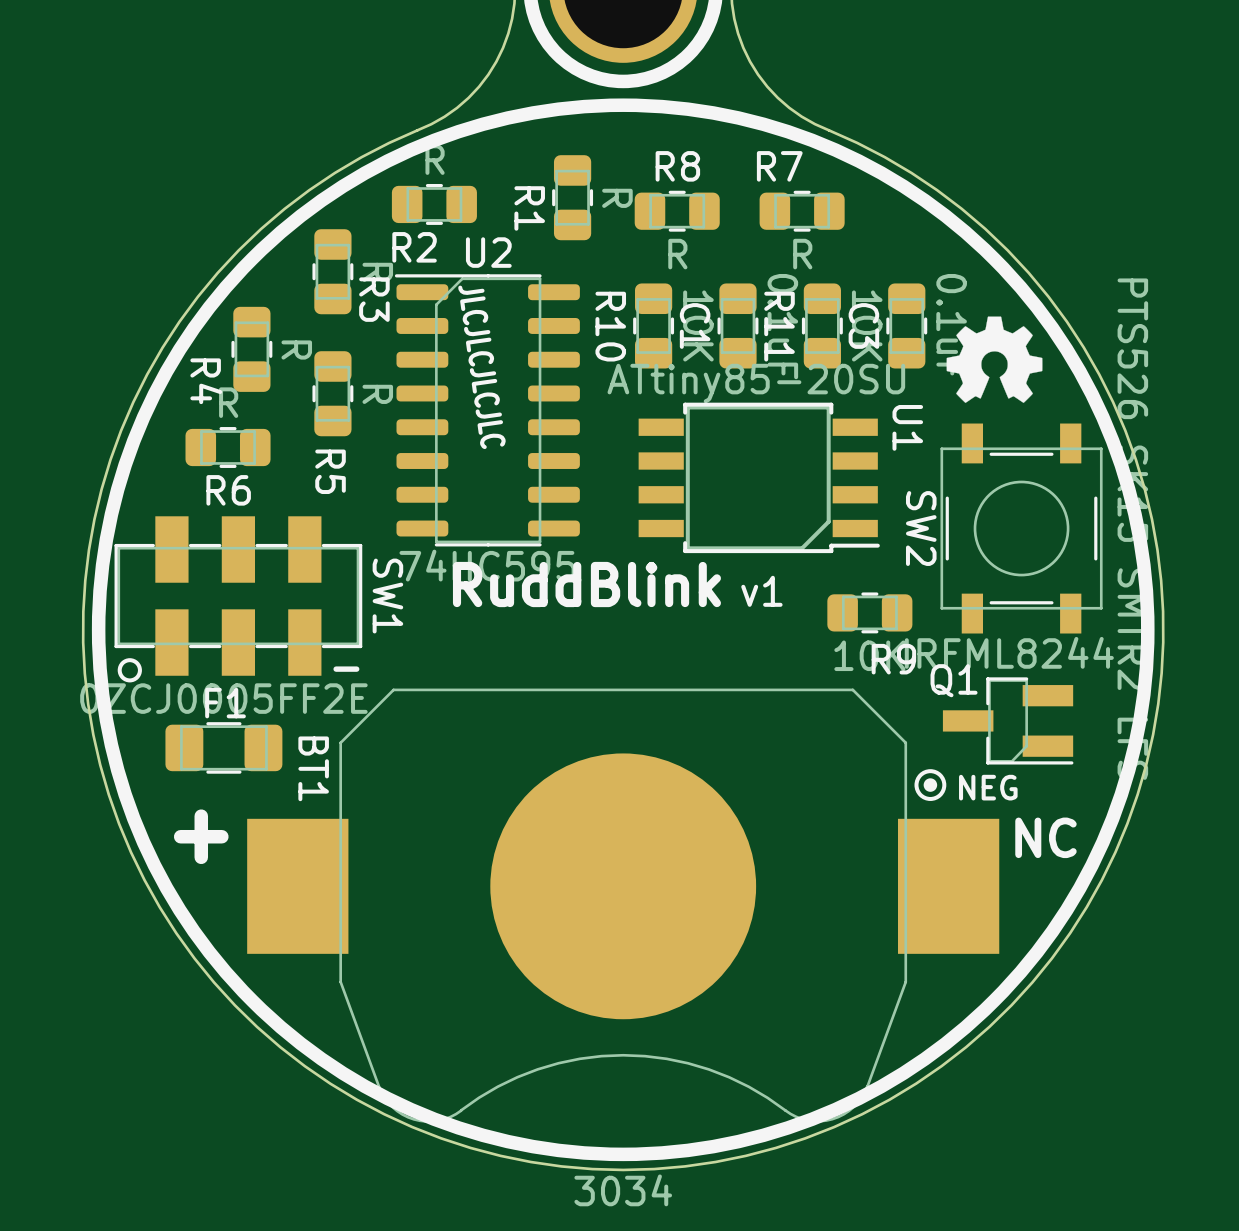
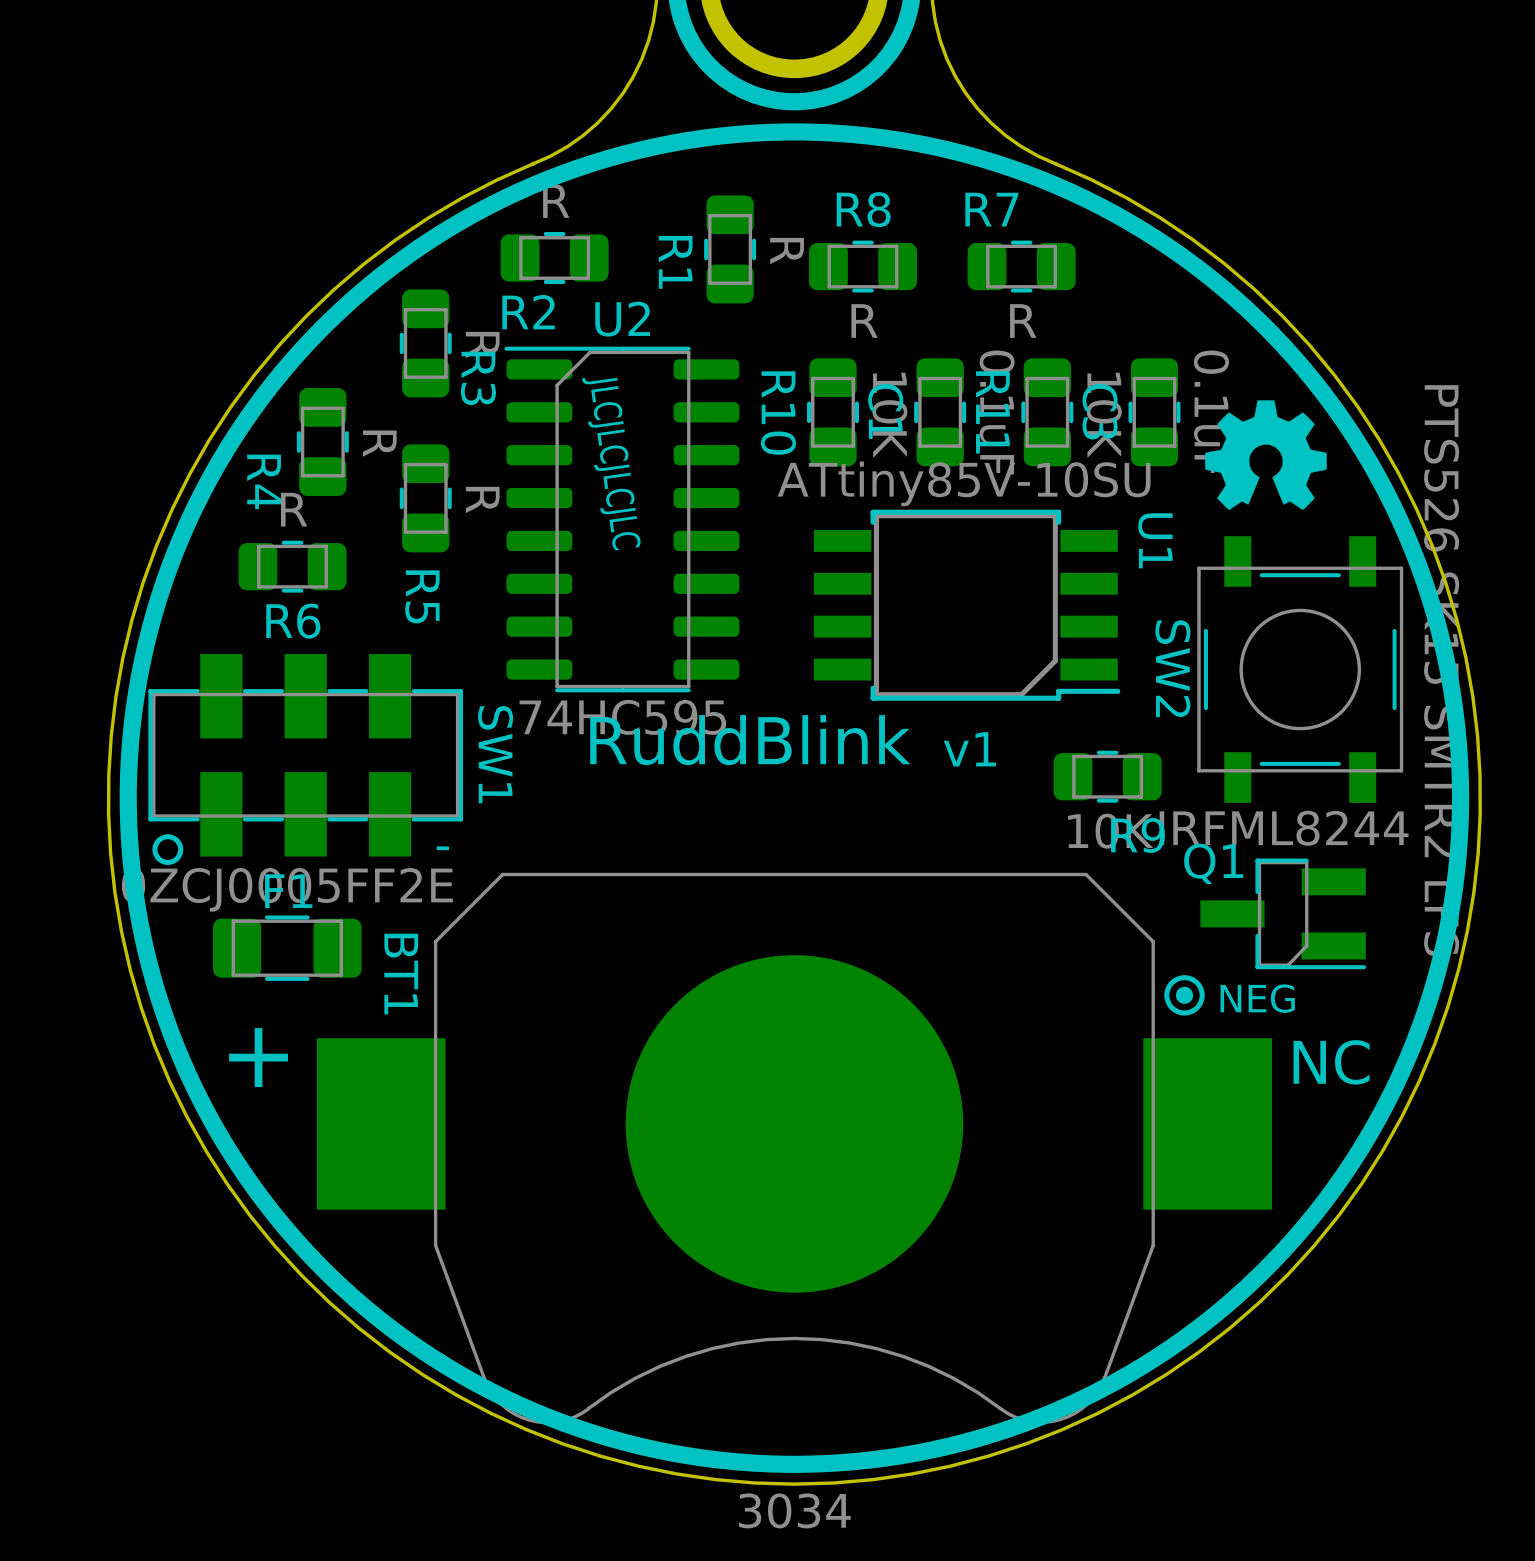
U1 value: ATtiny85-20SU (756, 383) -> ATtiny85V-10SU (964, 483)

